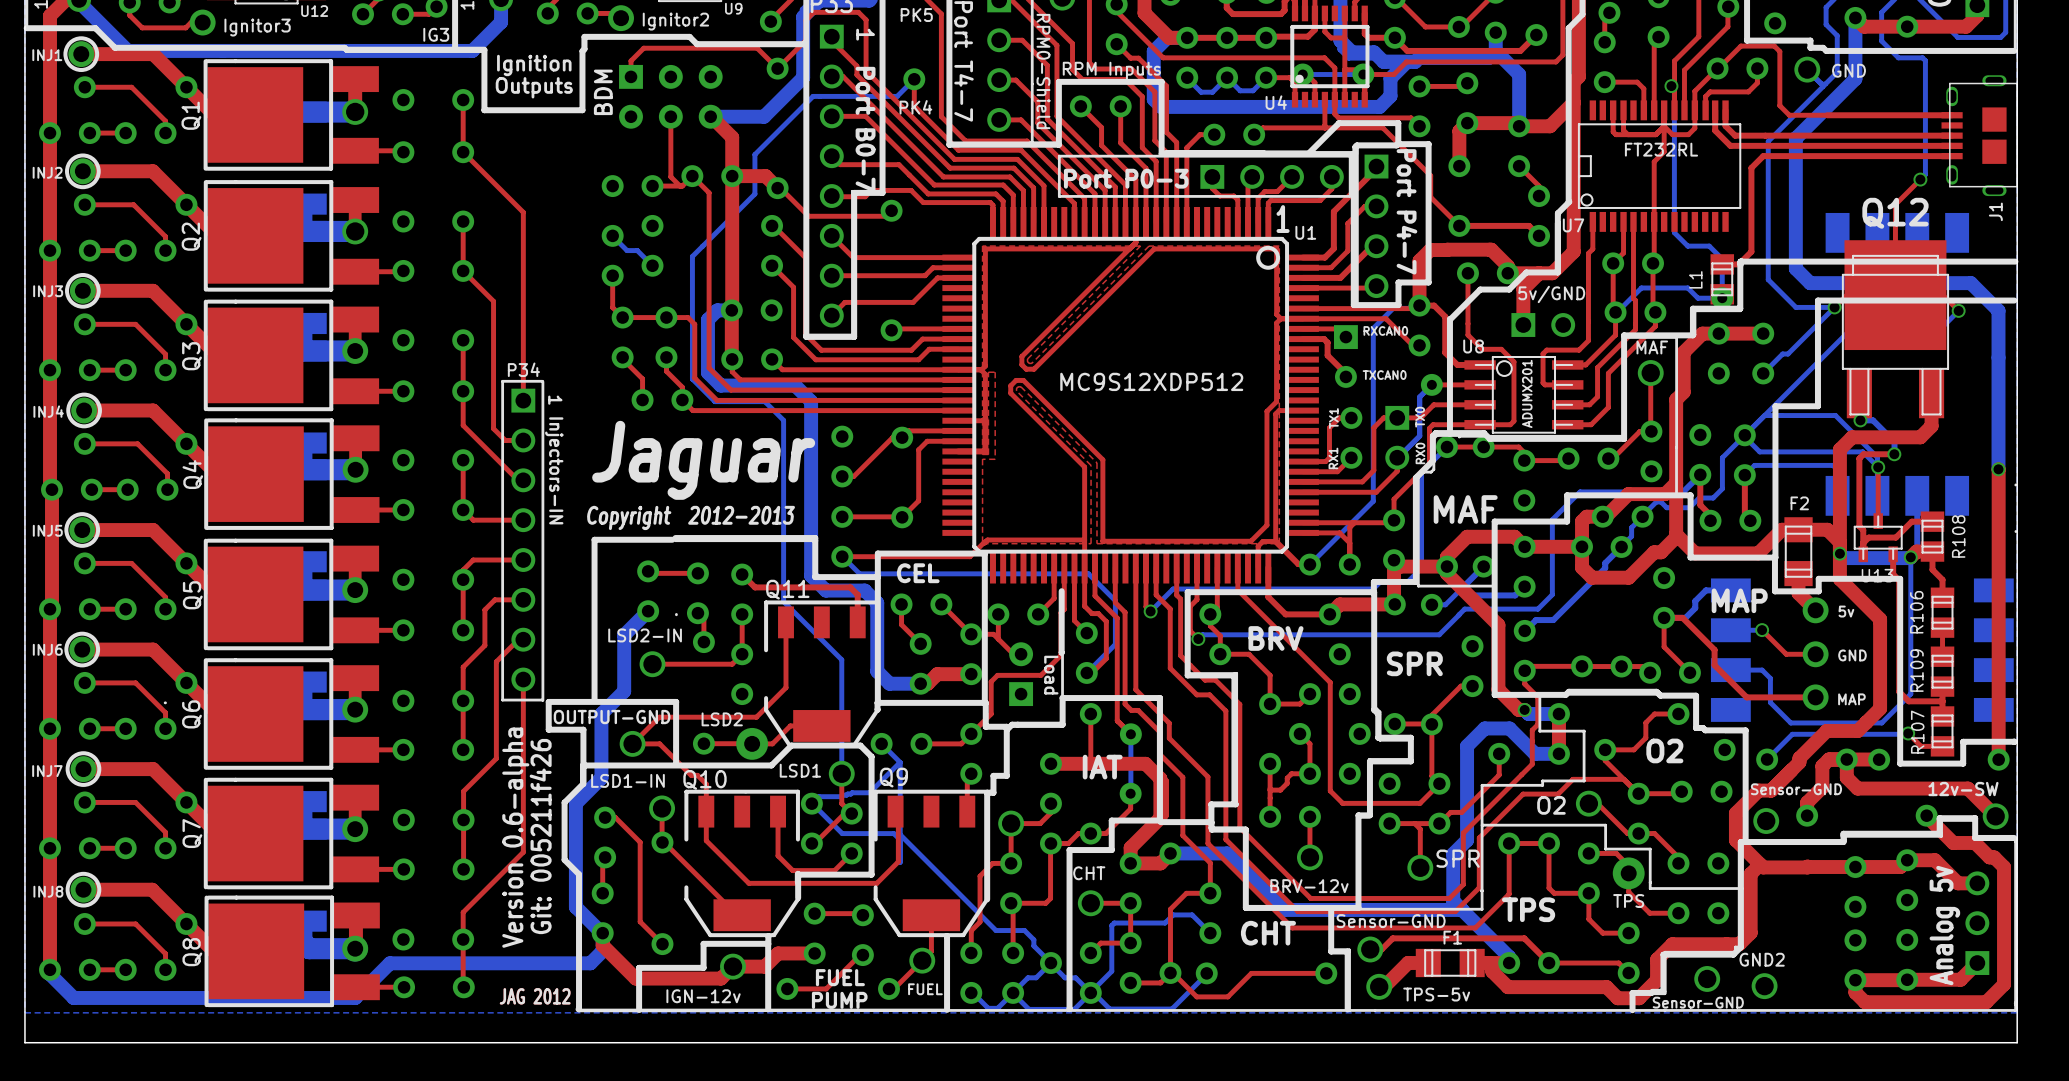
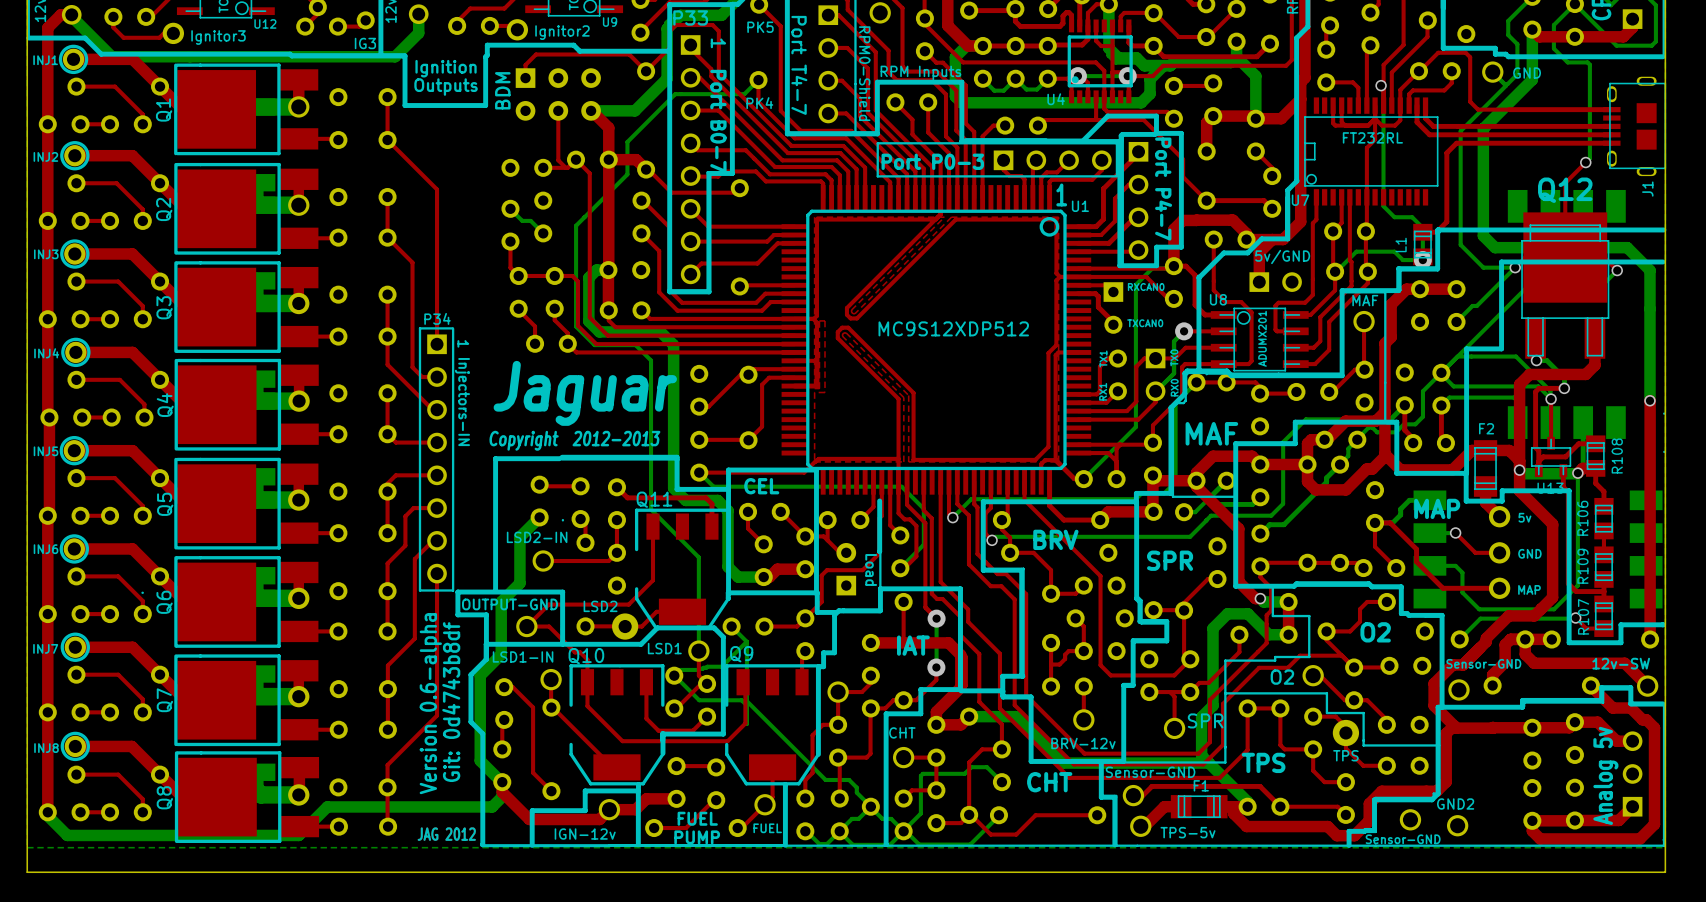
text: Git: 005211f426 (540, 836) -> Git: 0d4743b8df (451, 702)

